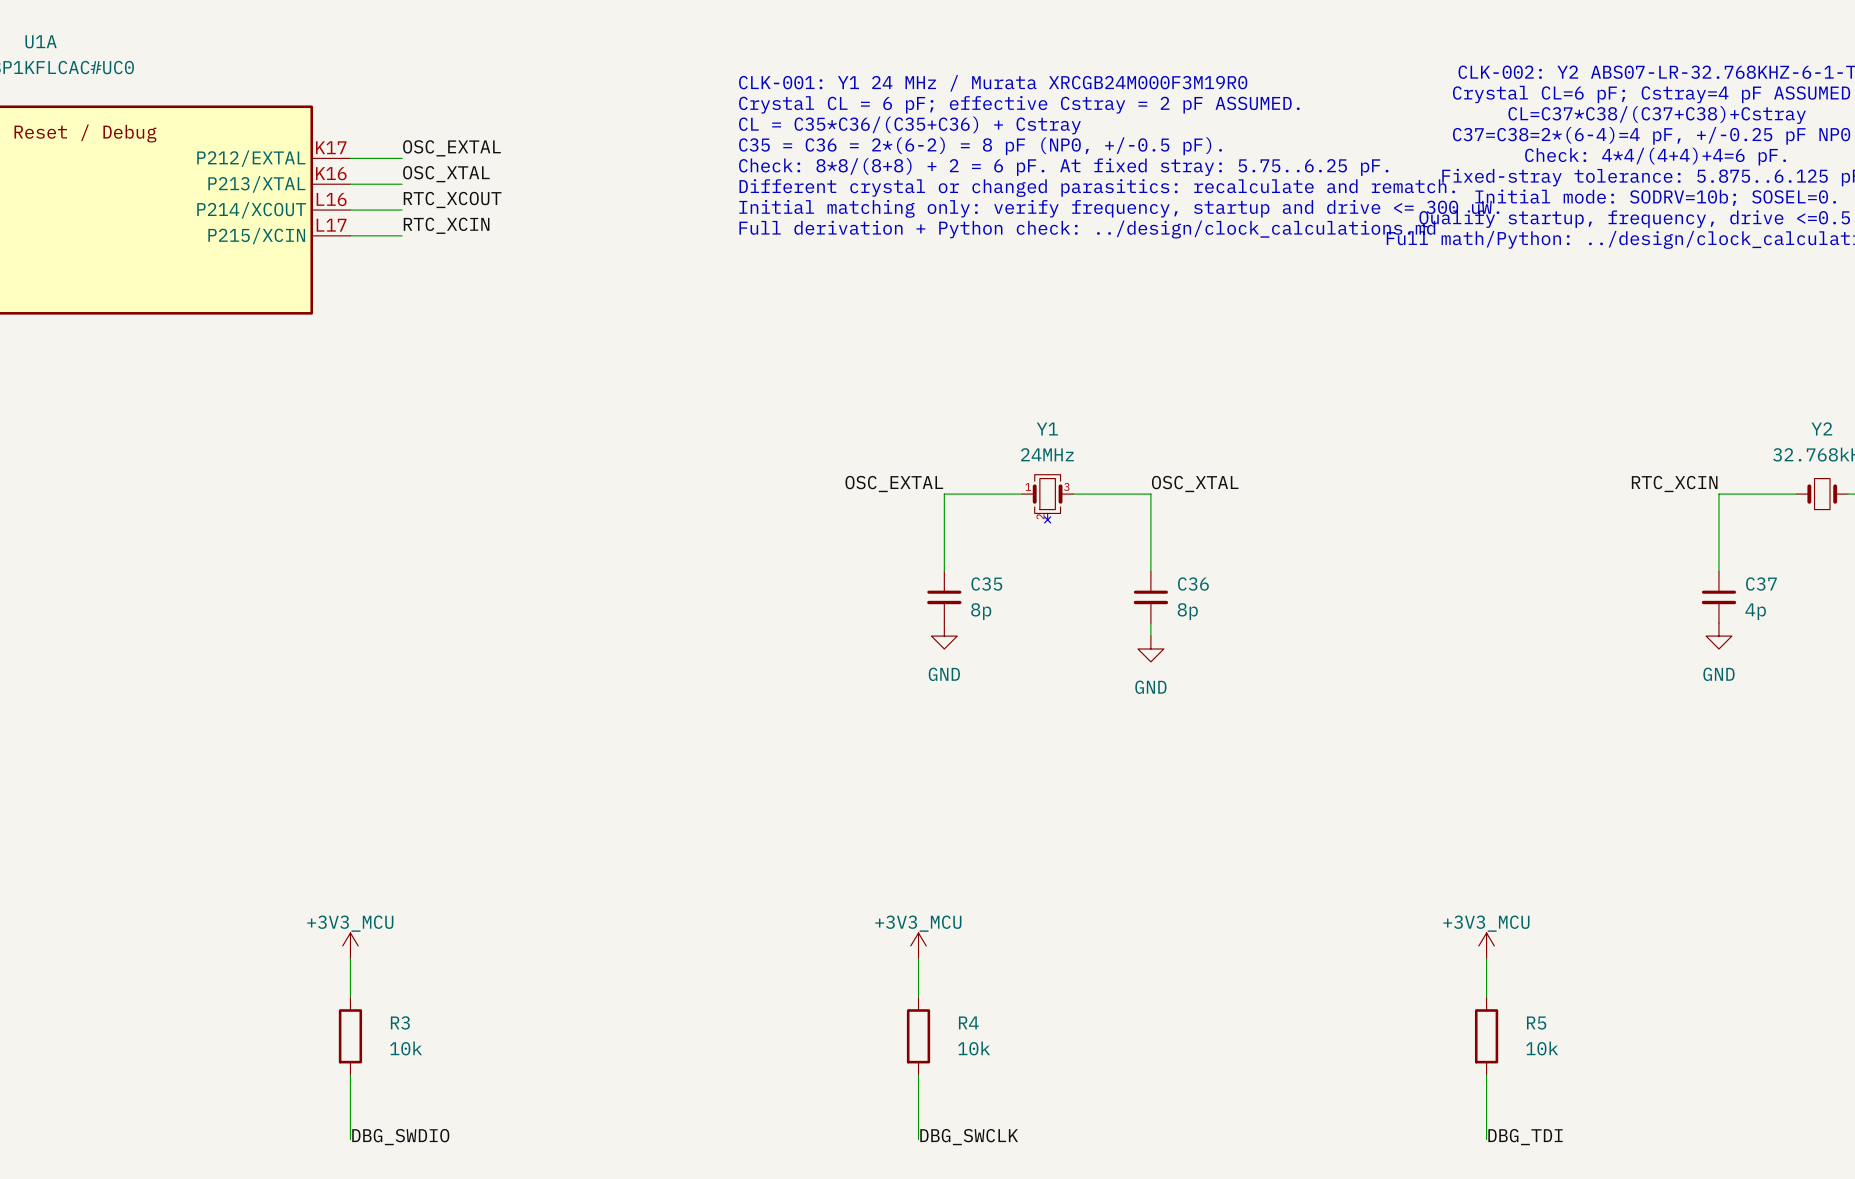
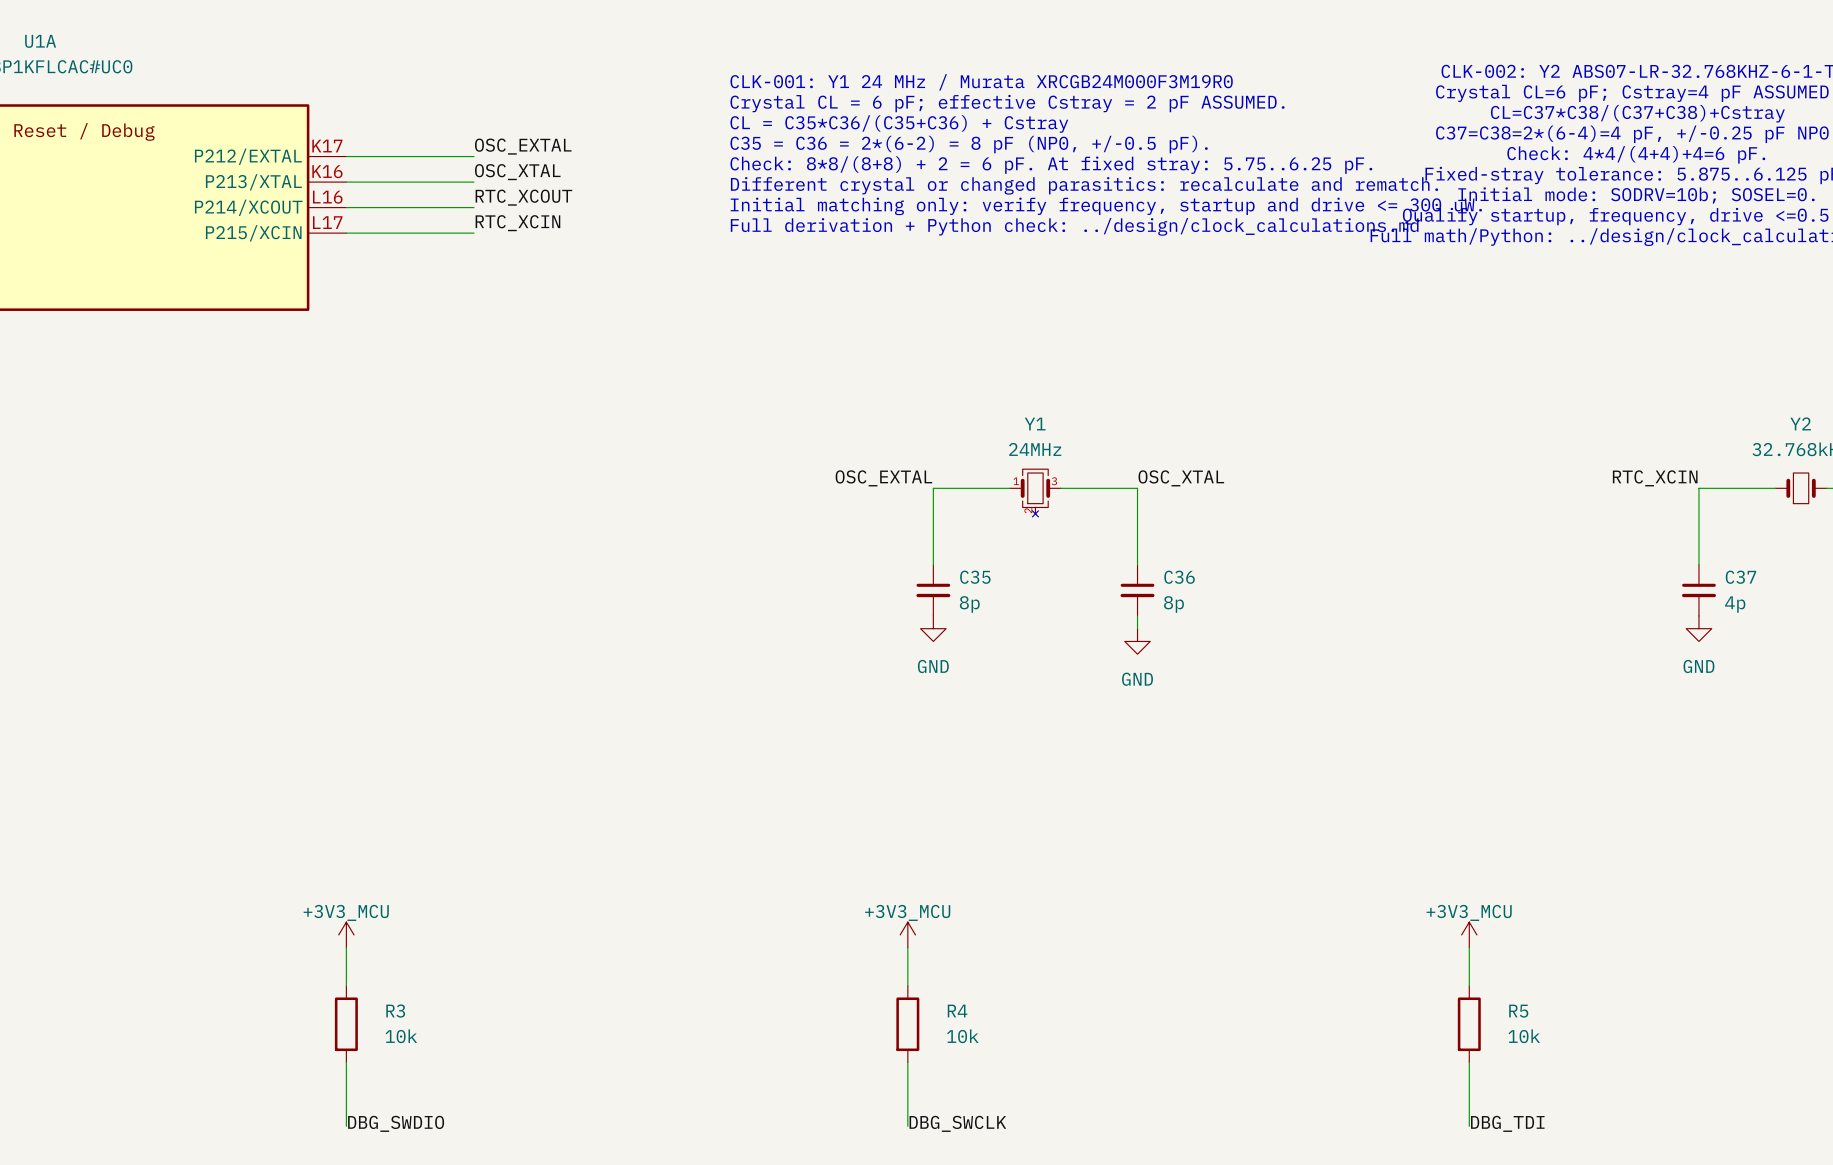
label position: OSC_EXTAL (451, 148) -> OSC_EXTAL (523, 146)
wire: none -> (397, 156) (473, 156)
label position: OSC_XTAL (446, 174) -> OSC_XTAL (517, 172)
wire: none -> (397, 182) (473, 182)
label position: RTC_XCOUT (452, 199) -> RTC_XCOUT (523, 197)
wire: none -> (397, 207) (473, 207)
label position: RTC_XCIN (446, 225) -> RTC_XCIN (517, 223)
wire: none -> (397, 233) (473, 233)

